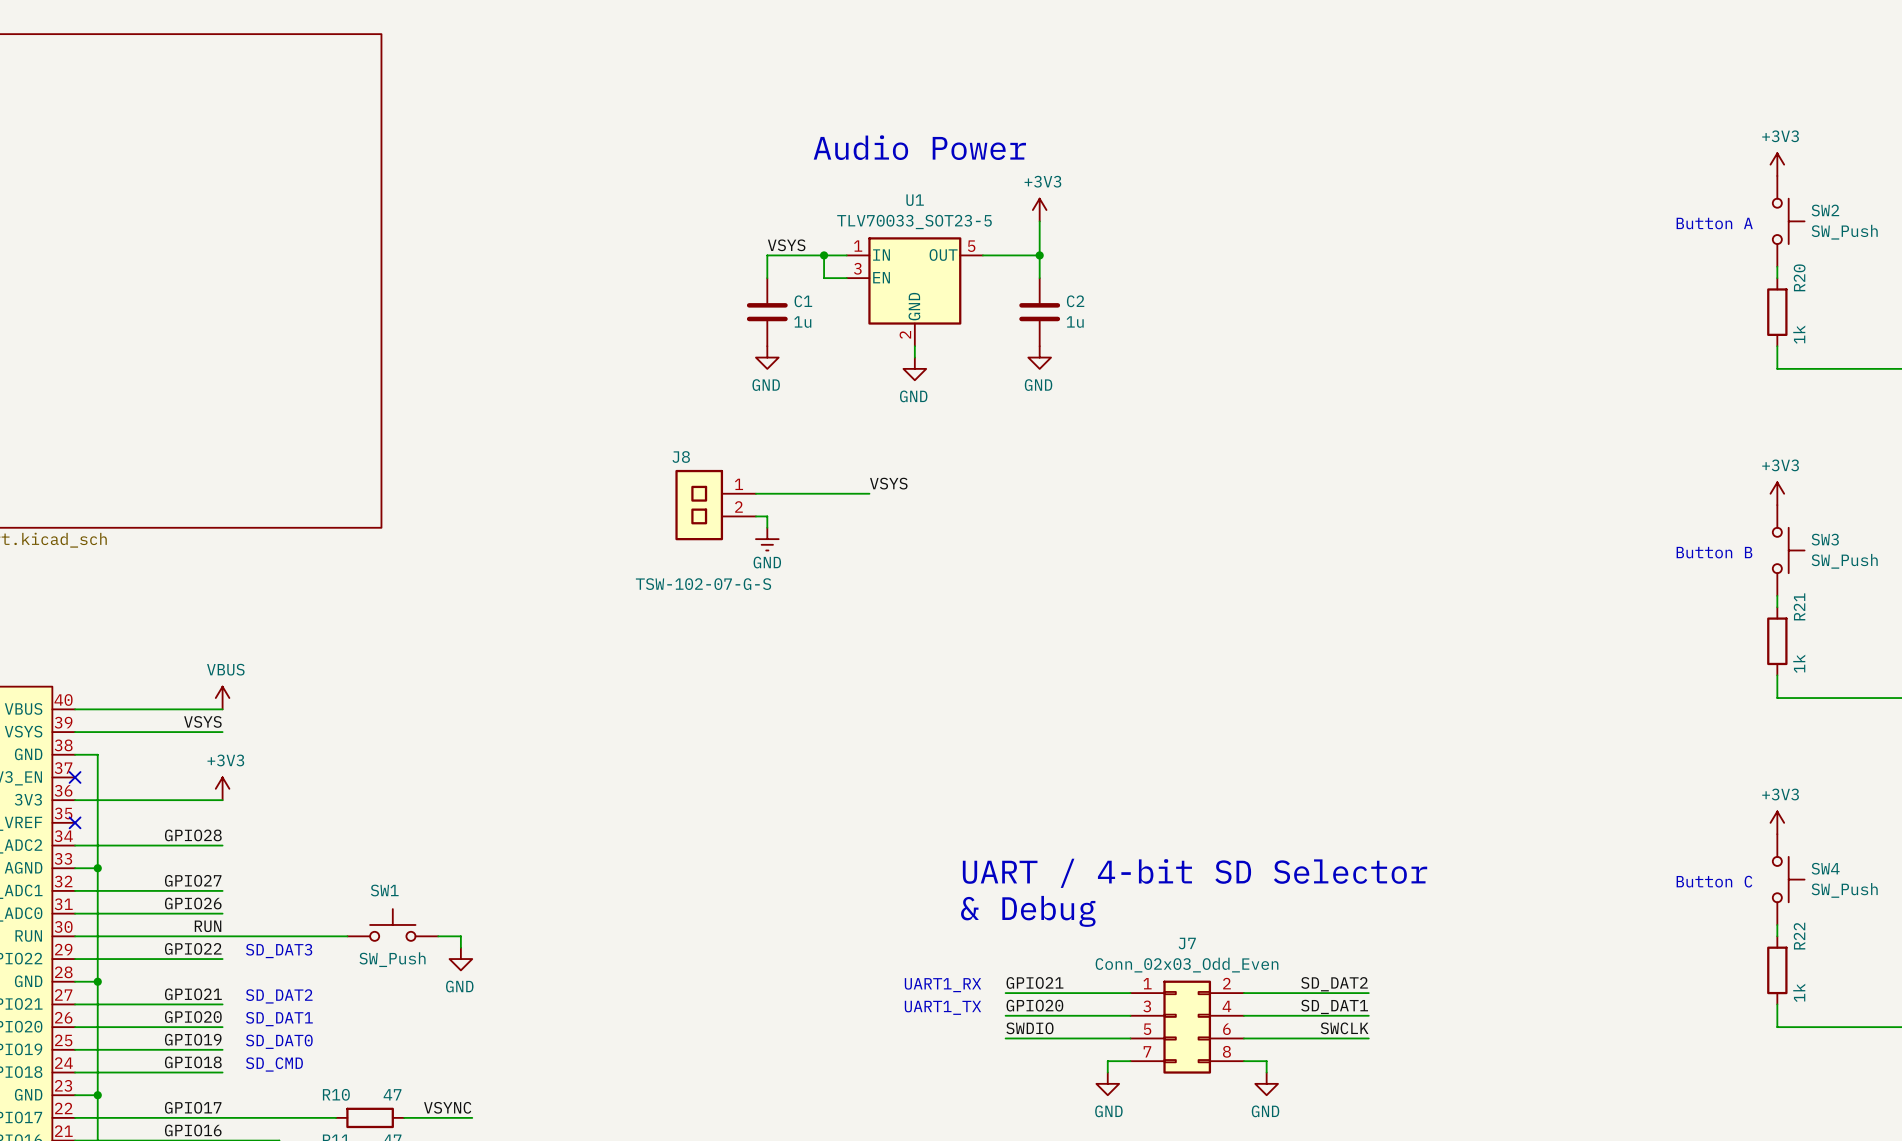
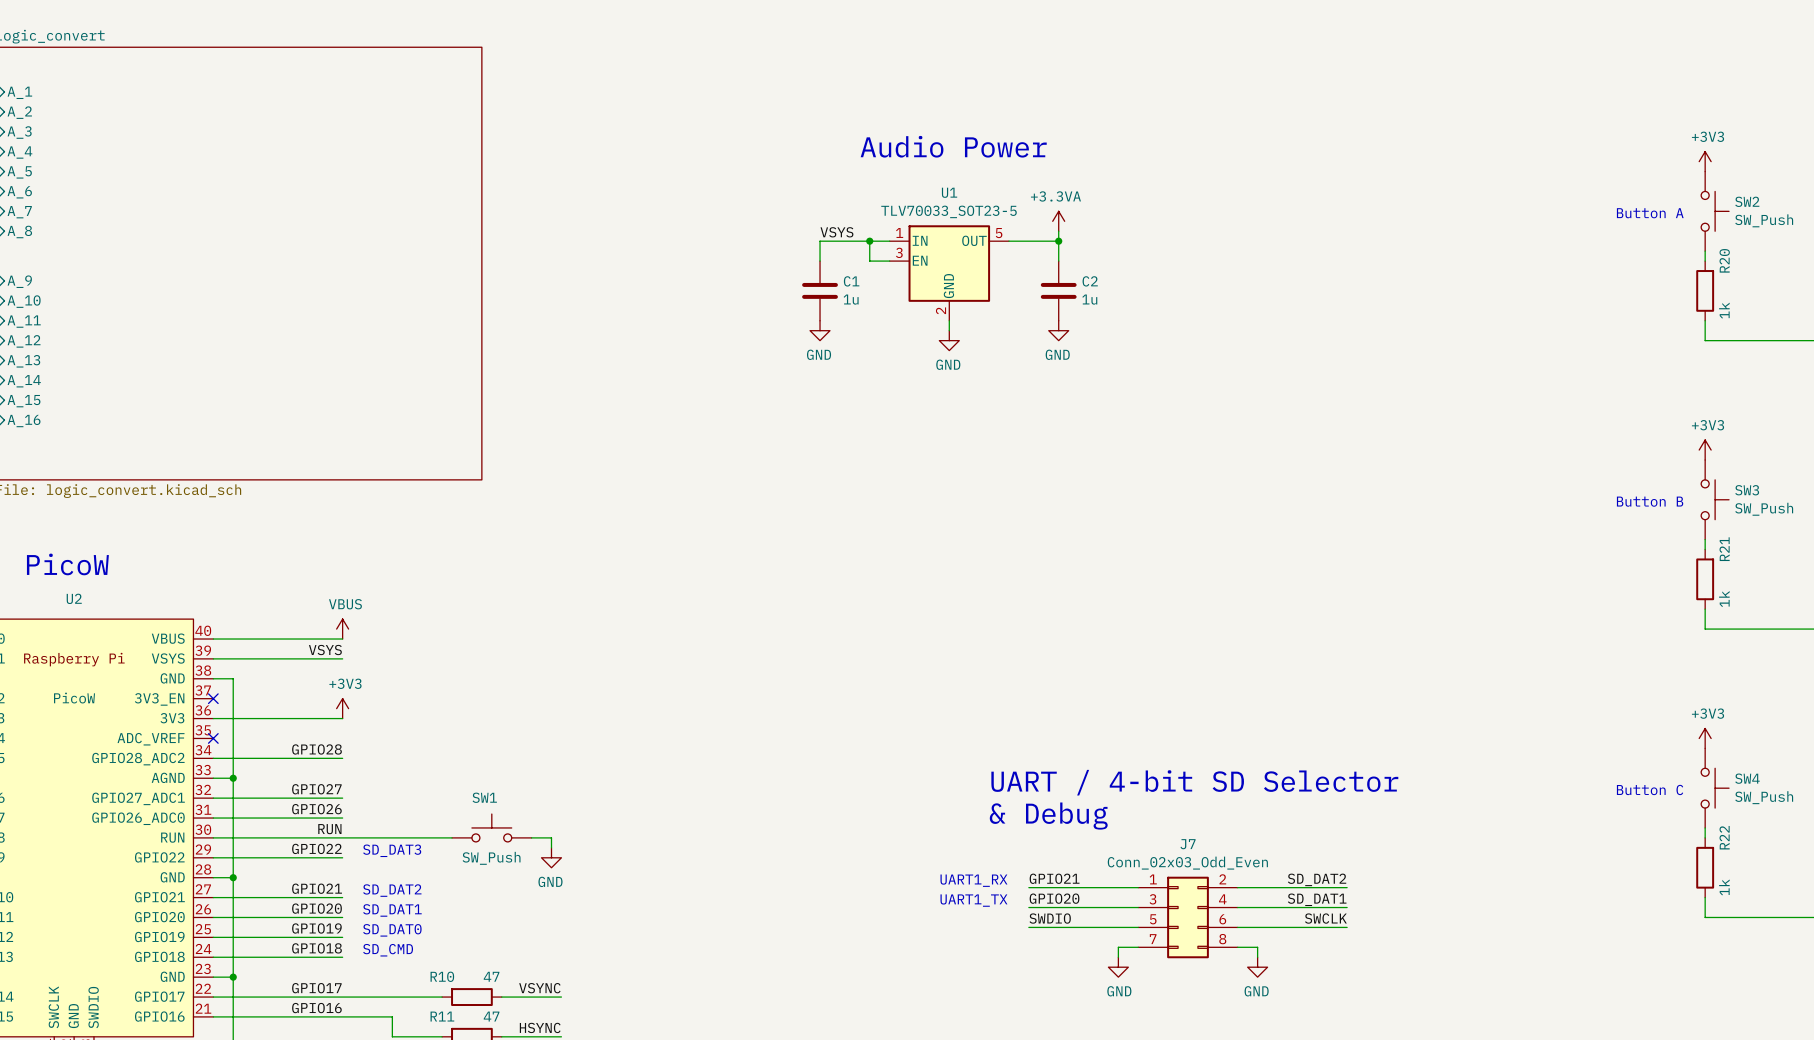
power symbol: +3V3 (1039, 210) -> none
power symbol: none -> +3.3VA (1058, 221)
label: VSYS (888, 483) -> none
wire: (755, 493) (869, 493) -> none
J8: TSW-102-07-G-S (715, 505) -> none
wire: (755, 516) (767, 516) (767, 527) -> none
power symbol: GND (767, 539) -> none

